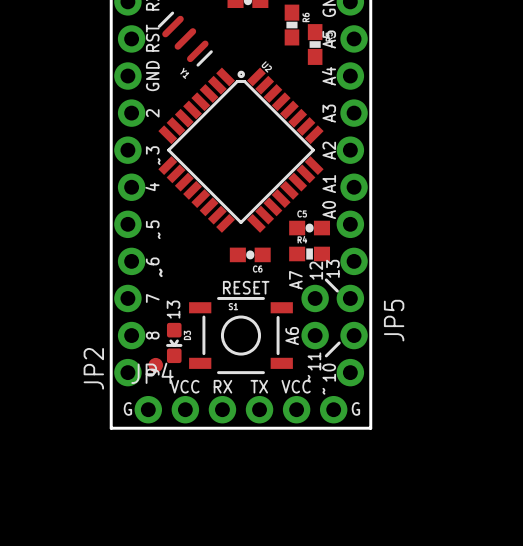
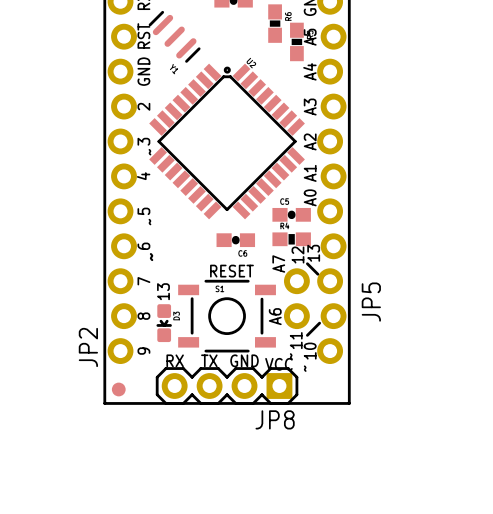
part position: (155, 365) -> (118, 389)
text: VCC (184, 386) -> RX (175, 360)
text: RX (222, 386) -> TX (209, 360)
text: TX (259, 386) -> GND (244, 360)
text: G (127, 408) -> none
text: G (355, 408) -> none
JP4: (240, 409) -> none
JP8: none -> (227, 386)

